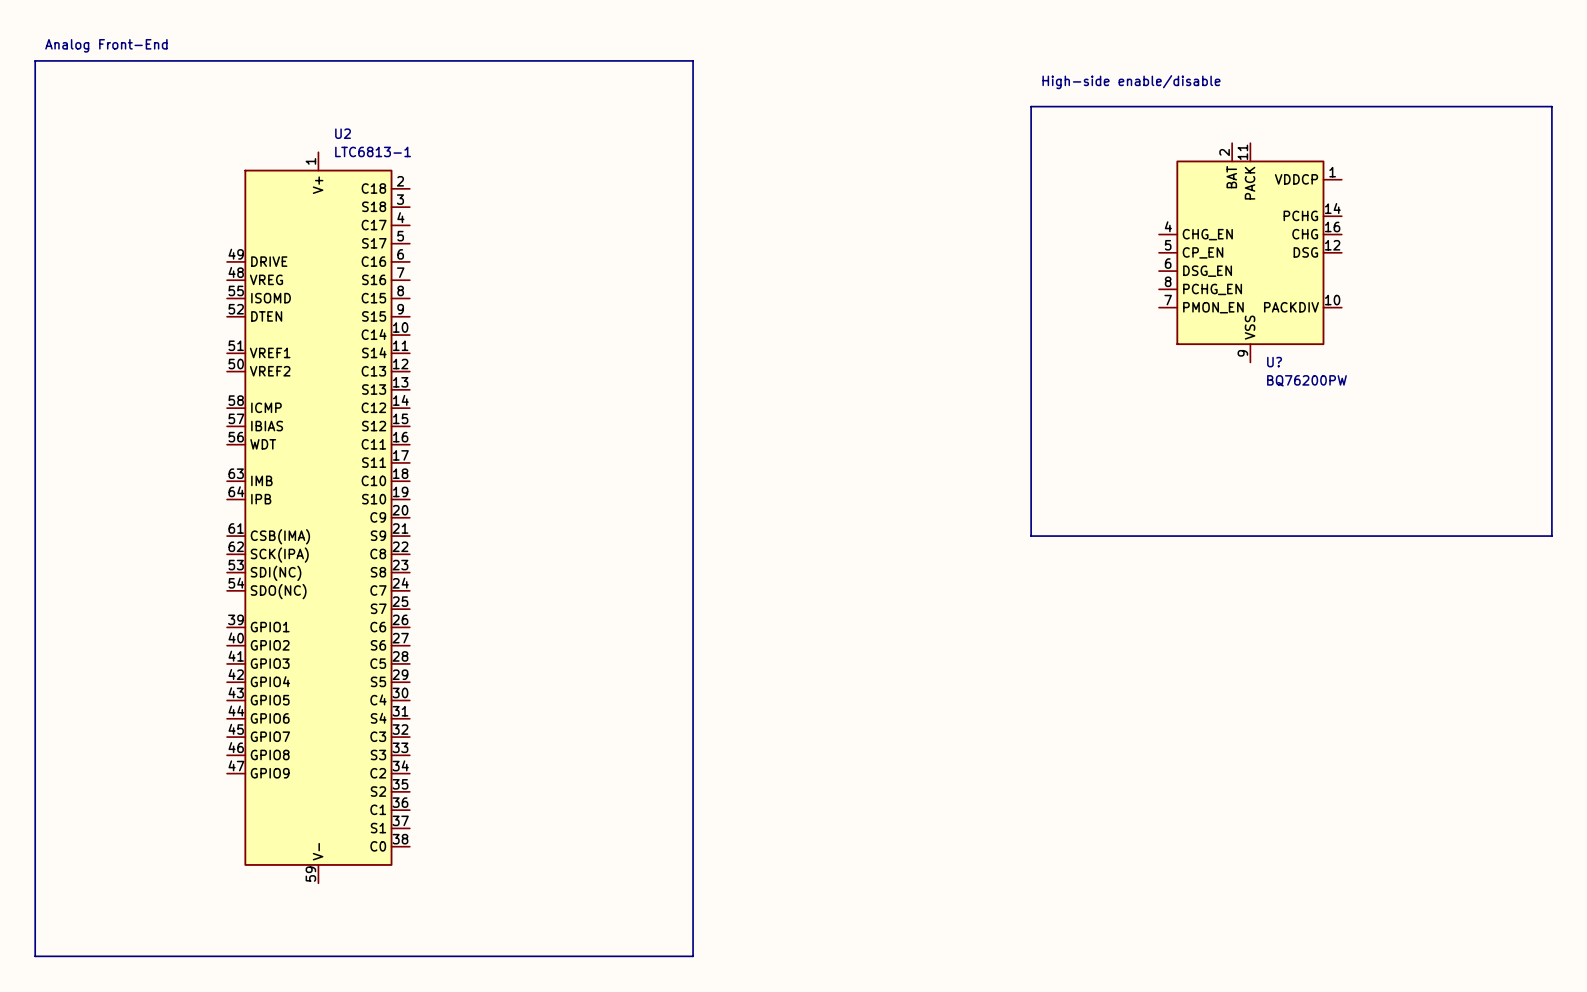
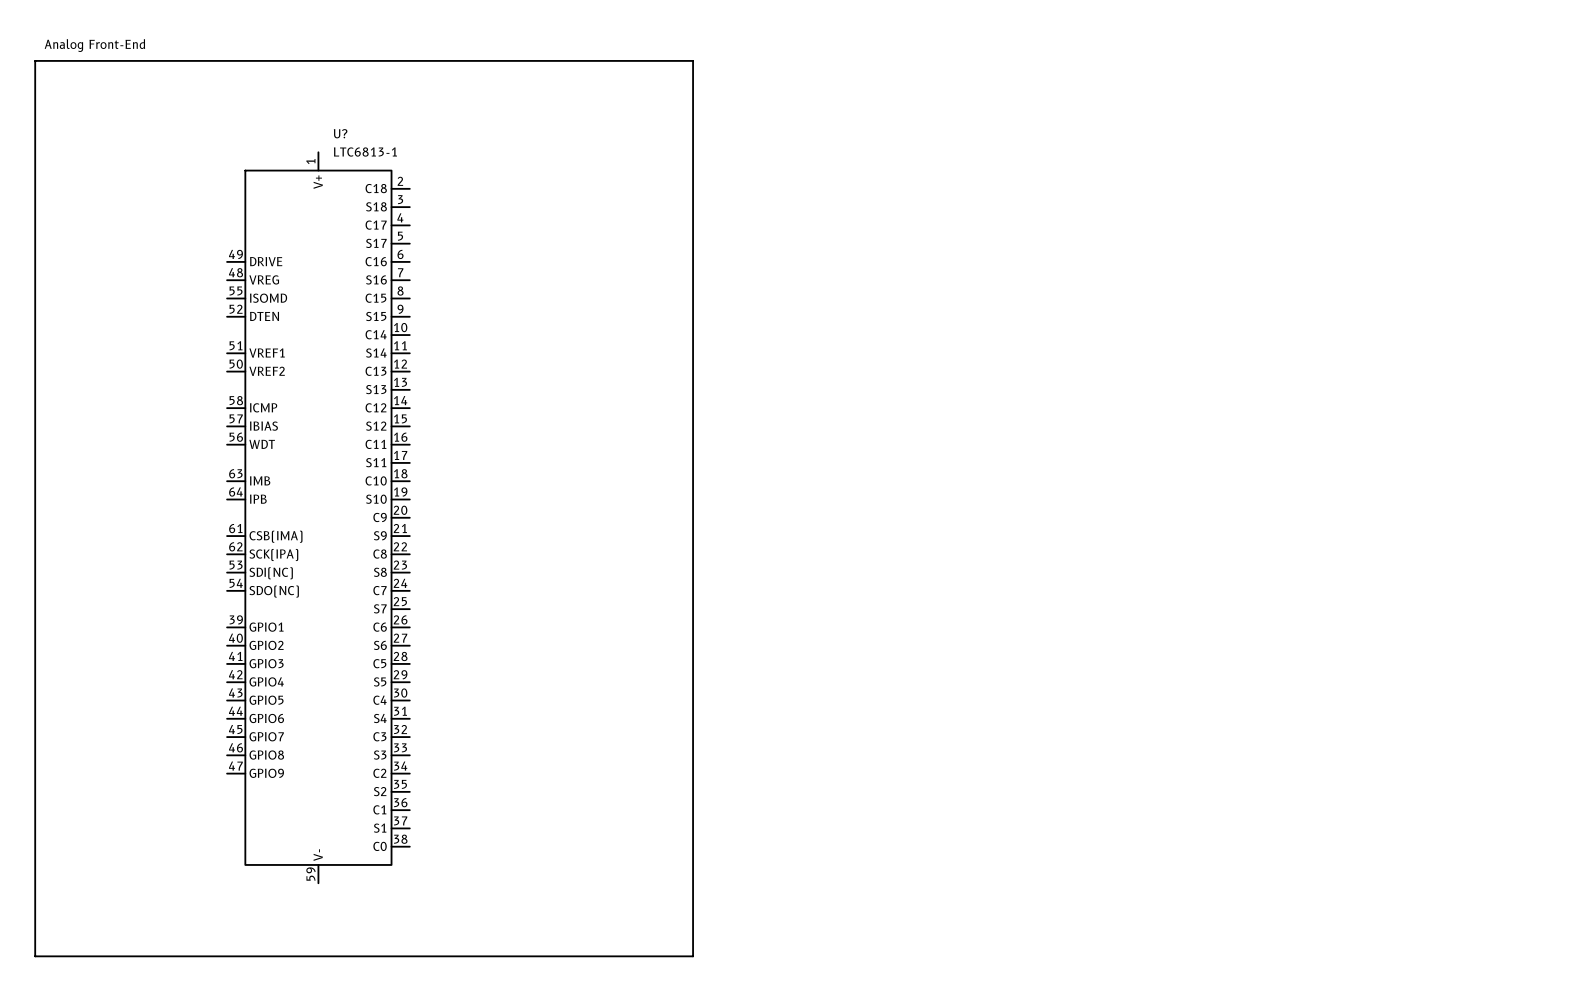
text: High-side enable/disable (1131, 82) -> none
line: (1031, 106) (1031, 536) (1551, 536) (1551, 106) (1031, 106) -> none
U2 name: U2 (343, 133) -> U? (340, 133)
U?: BQ76200PW (1250, 252) -> none

